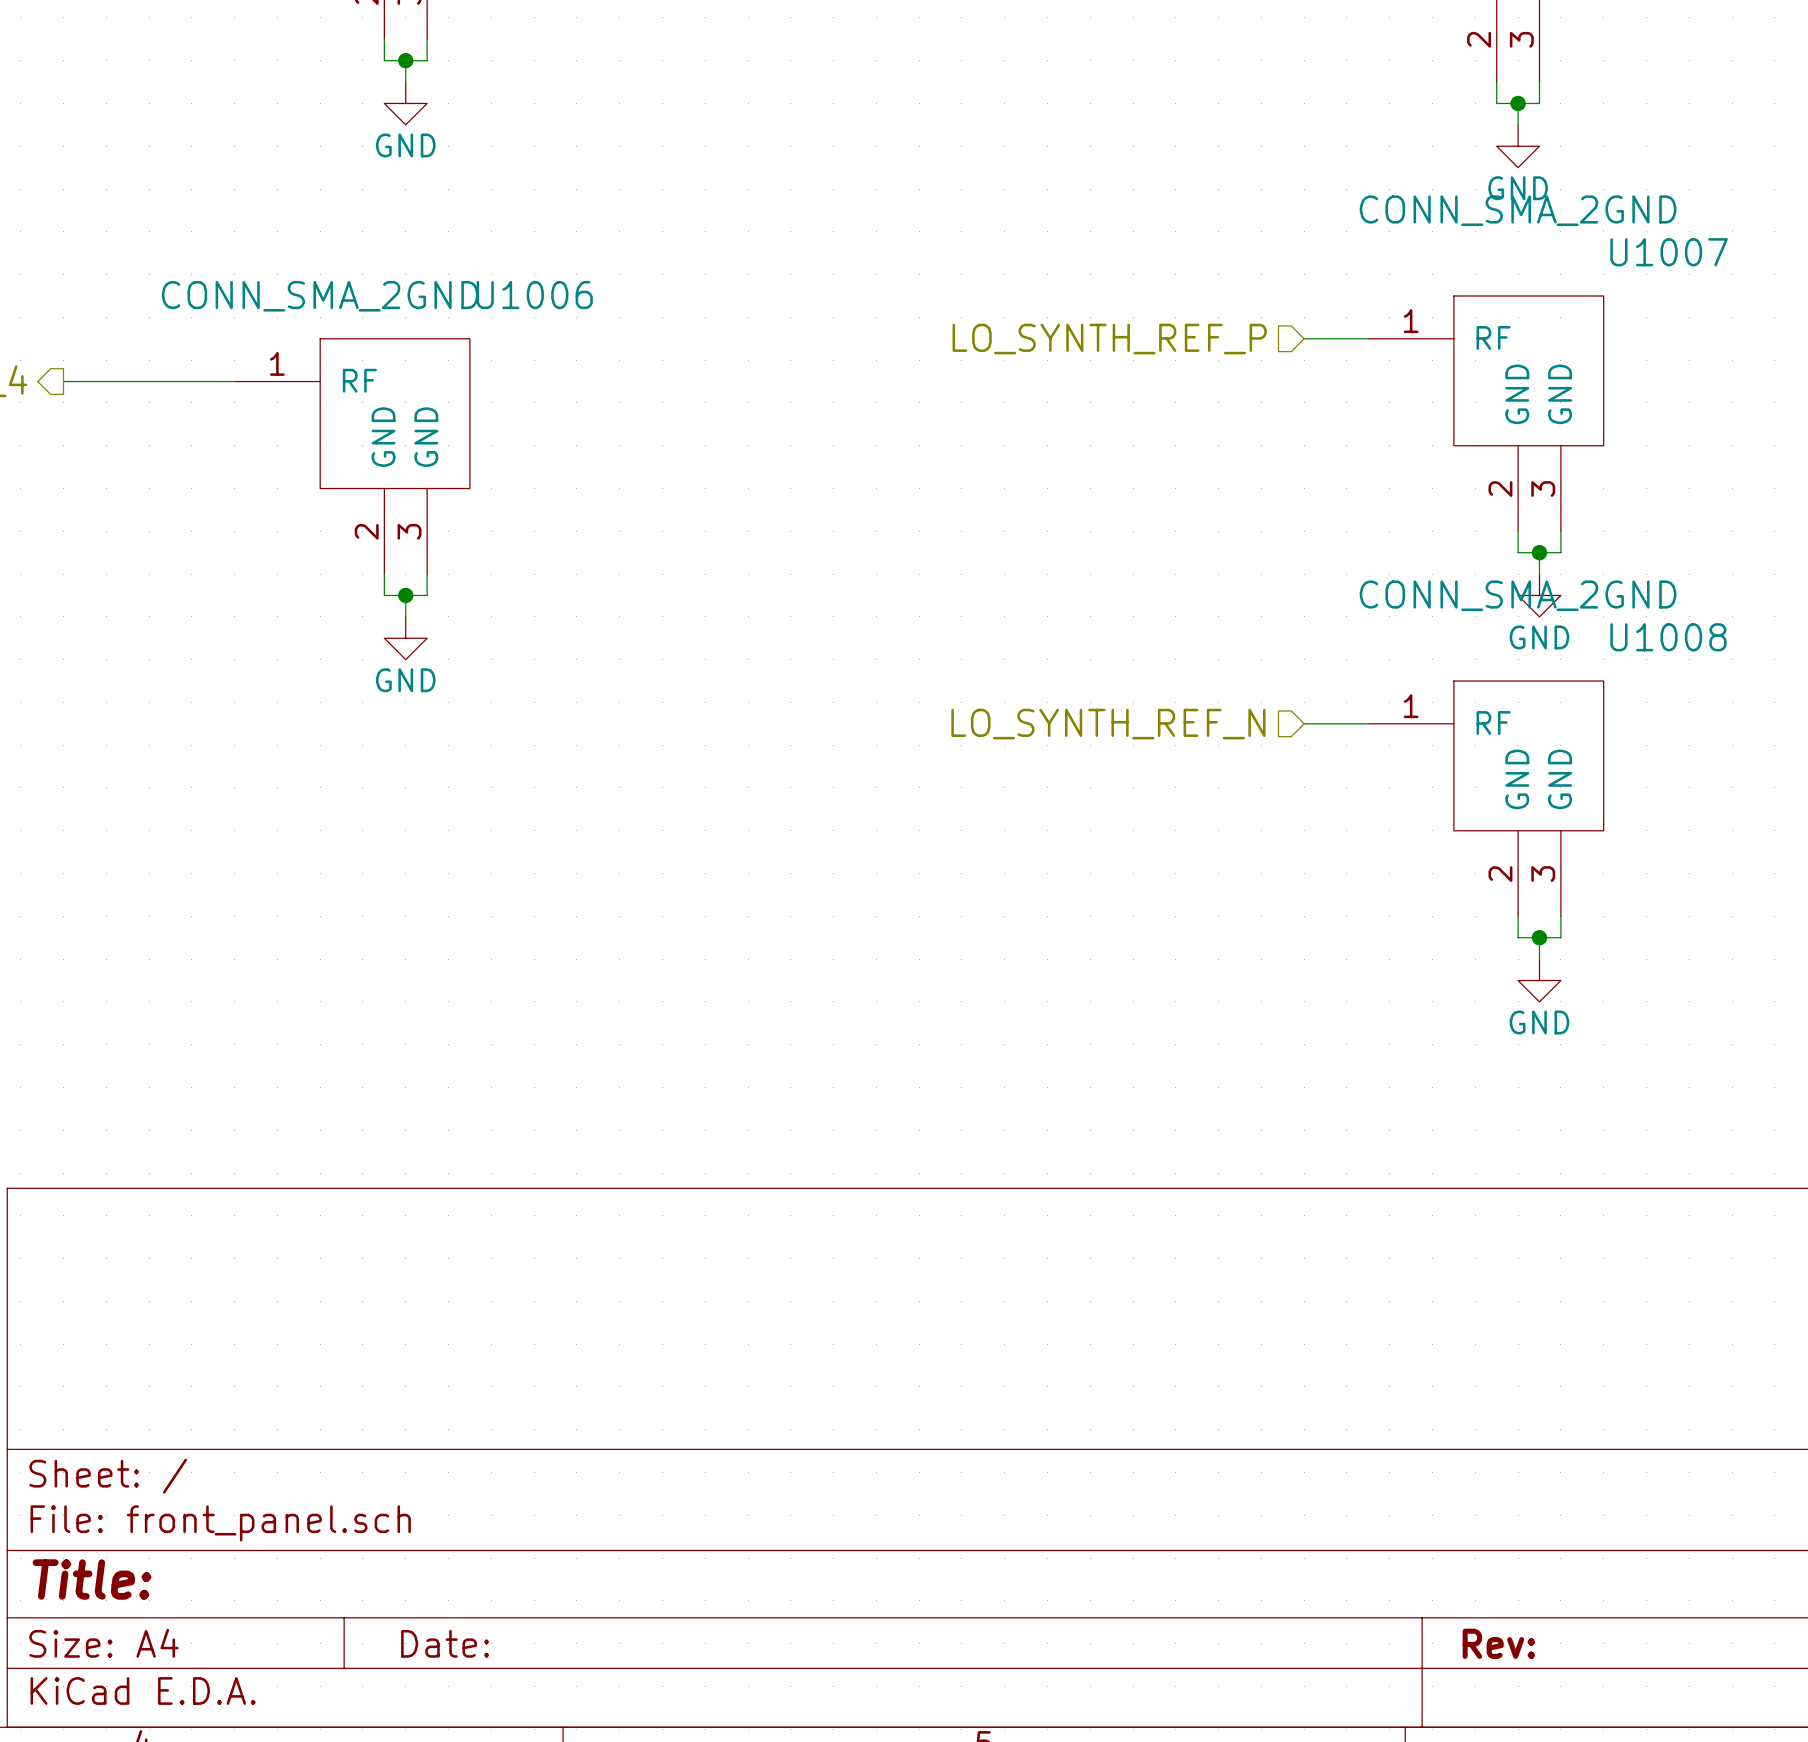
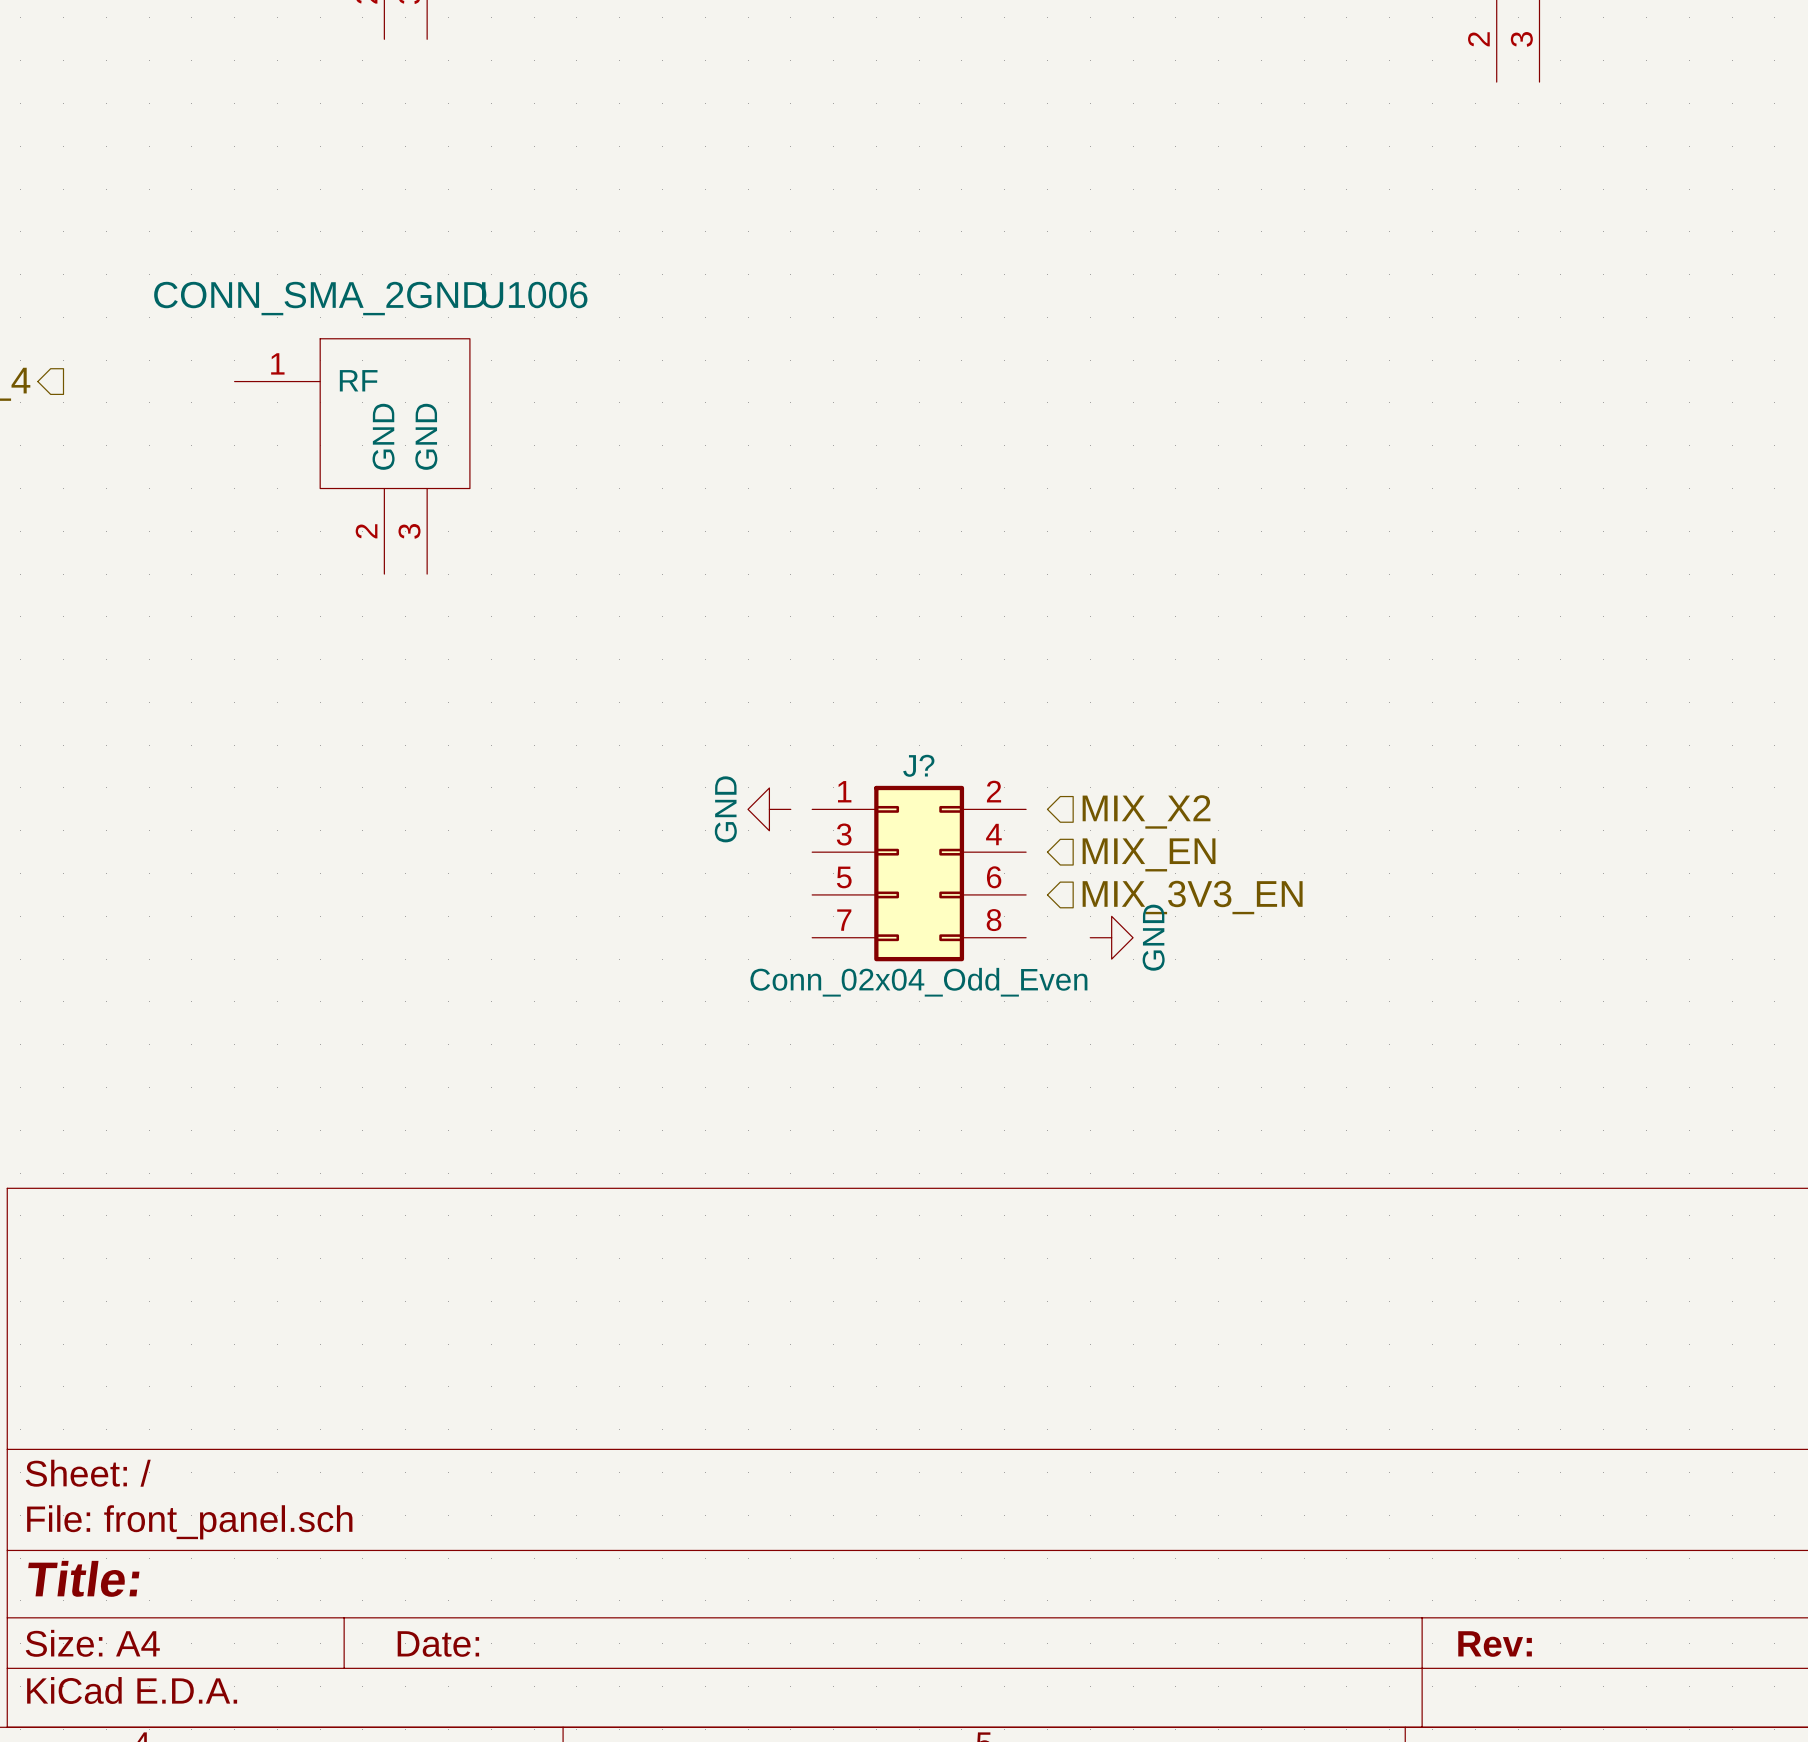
wire: (384, 39) (384, 60) (427, 60) (427, 39) -> none
wire: (405, 60) (405, 82) -> none
junction: (405, 60) -> none
wire: (1496, 82) (1496, 103) (1539, 103) (1539, 82) -> none
power symbol: GND (405, 103) -> none
wire: (1518, 103) (1518, 124) -> none
junction: (1518, 103) -> none
power symbol: GND (1518, 146) -> none
wire: (1304, 338) (1368, 338) -> none
hierarchical label: LO_SYNTH_REF_P (1109, 339) -> none
wire: (63, 381) (234, 381) -> none
U1007: CONN_SMA_2GND (1486, 413) -> none
wire: (1518, 531) (1518, 552) (1560, 552) (1560, 531) -> none
wire: (1539, 552) (1539, 574) -> none
junction: (1539, 552) -> none
wire: (384, 574) (384, 595) (427, 595) (427, 574) -> none
wire: (405, 595) (405, 616) -> none
junction: (405, 595) -> none
power symbol: GND (1539, 595) -> none
power symbol: GND (405, 638) -> none
wire: (1304, 723) (1368, 723) -> none
hierarchical label: LO_SYNTH_REF_N (1108, 724) -> none
U1008: CONN_SMA_2GND (1486, 798) -> none
power symbol: none -> GND (769, 809)
hierarchical label: none -> MIX_X2 (1146, 811)
hierarchical label: none -> MIX_EN (1149, 854)
J?: none -> Conn_02x04_Odd_Even (919, 873)
hierarchical label: none -> MIX_3V3_EN (1192, 897)
wire: (1518, 916) (1518, 937) (1560, 937) (1560, 916) -> none
power symbol: none -> GND (1111, 937)
wire: (1539, 937) (1539, 959) -> none
junction: (1539, 937) -> none
power symbol: GND (1539, 980) -> none

